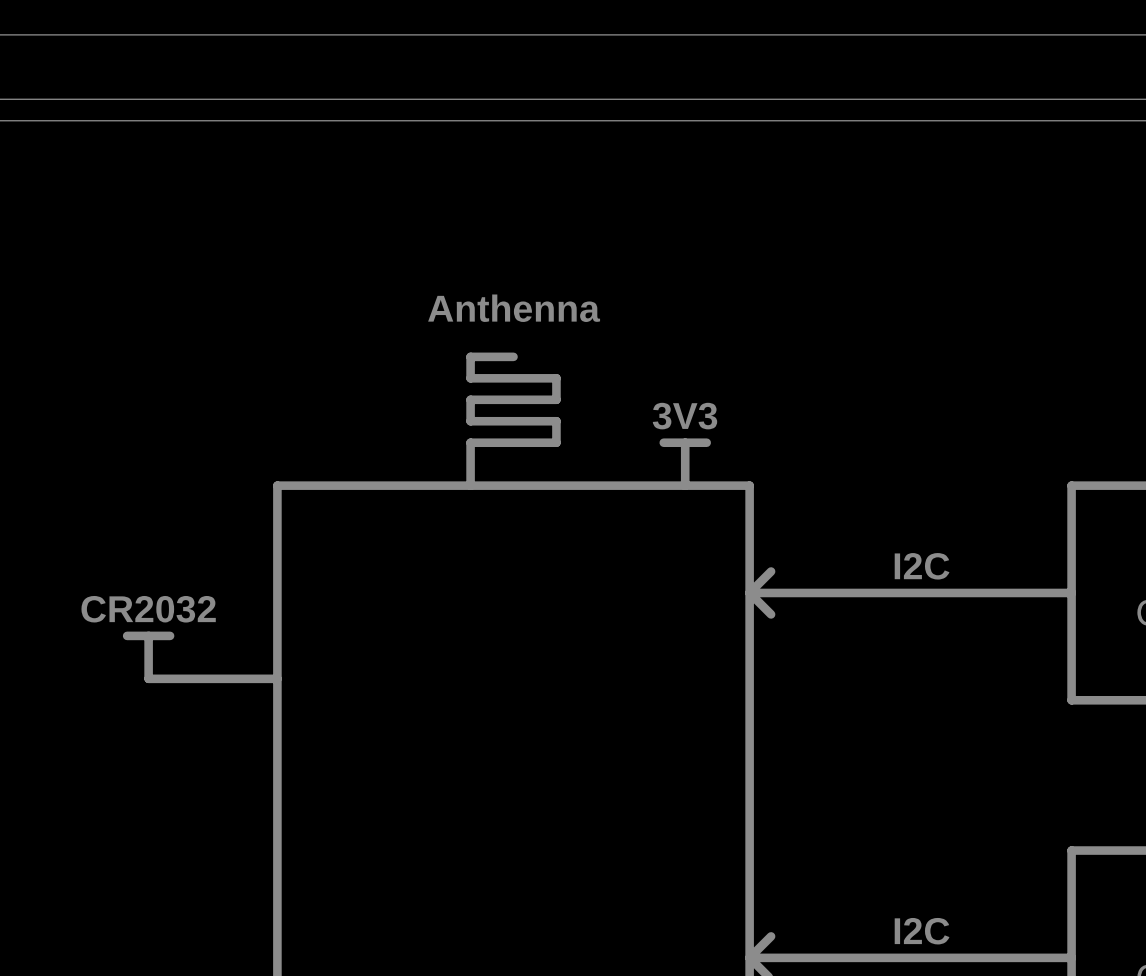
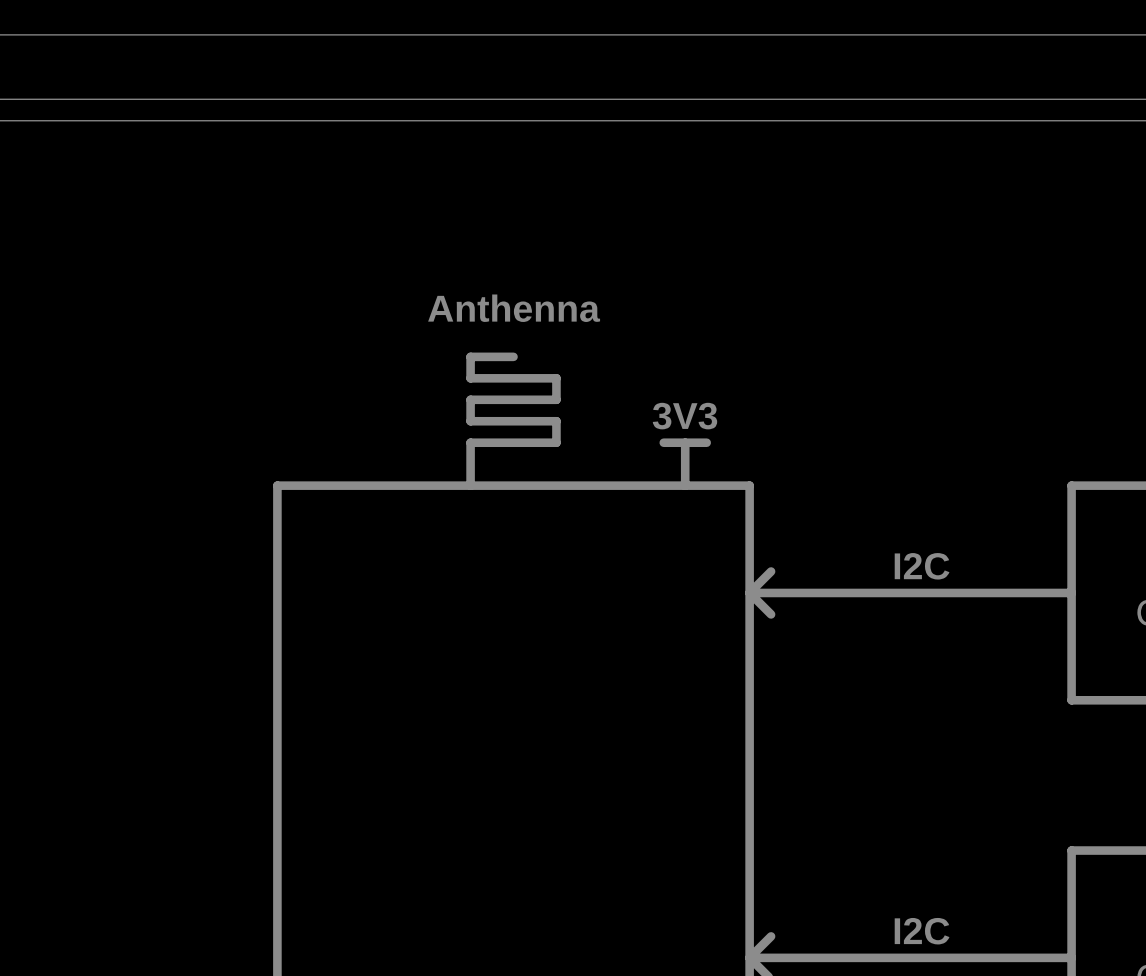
text: CR2032 (148, 609) -> none
line: (127, 635) (170, 635) -> none
line: (148, 635) (148, 678) (277, 678) -> none

